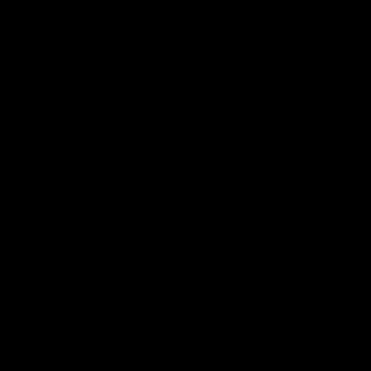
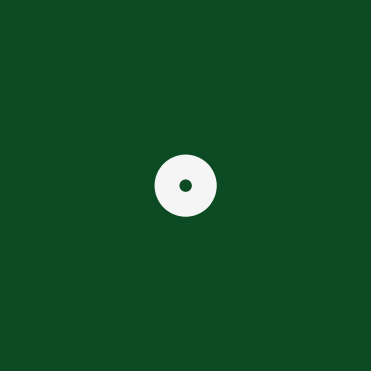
part: none -> (185, 185)

